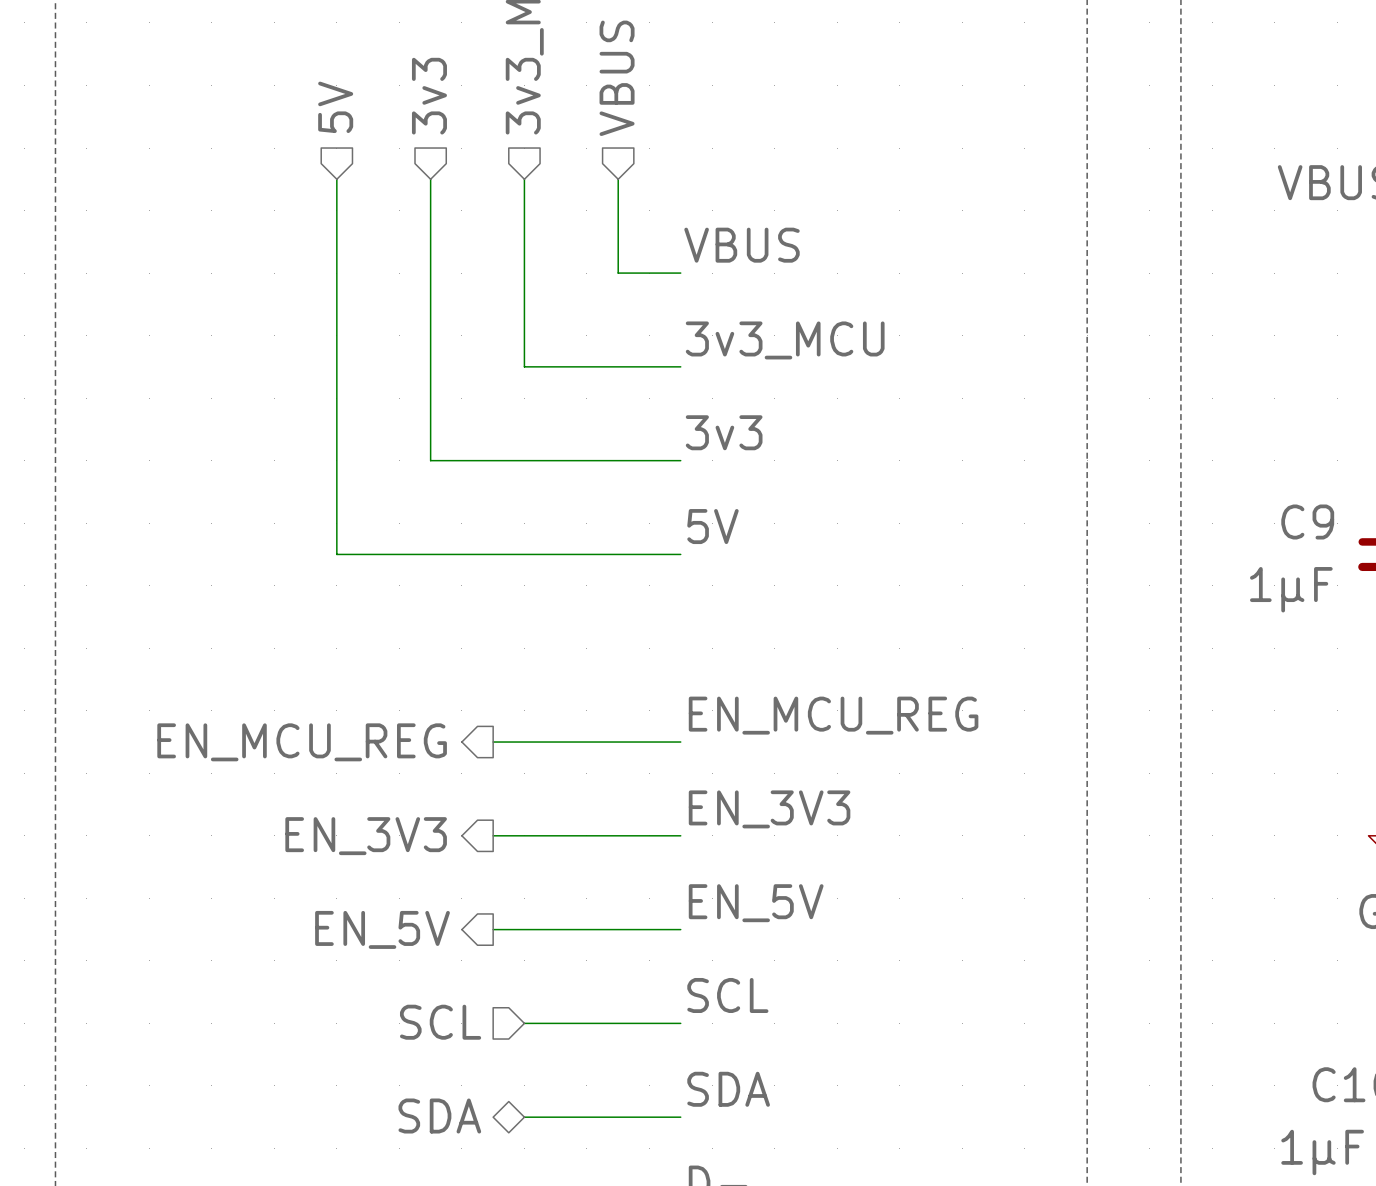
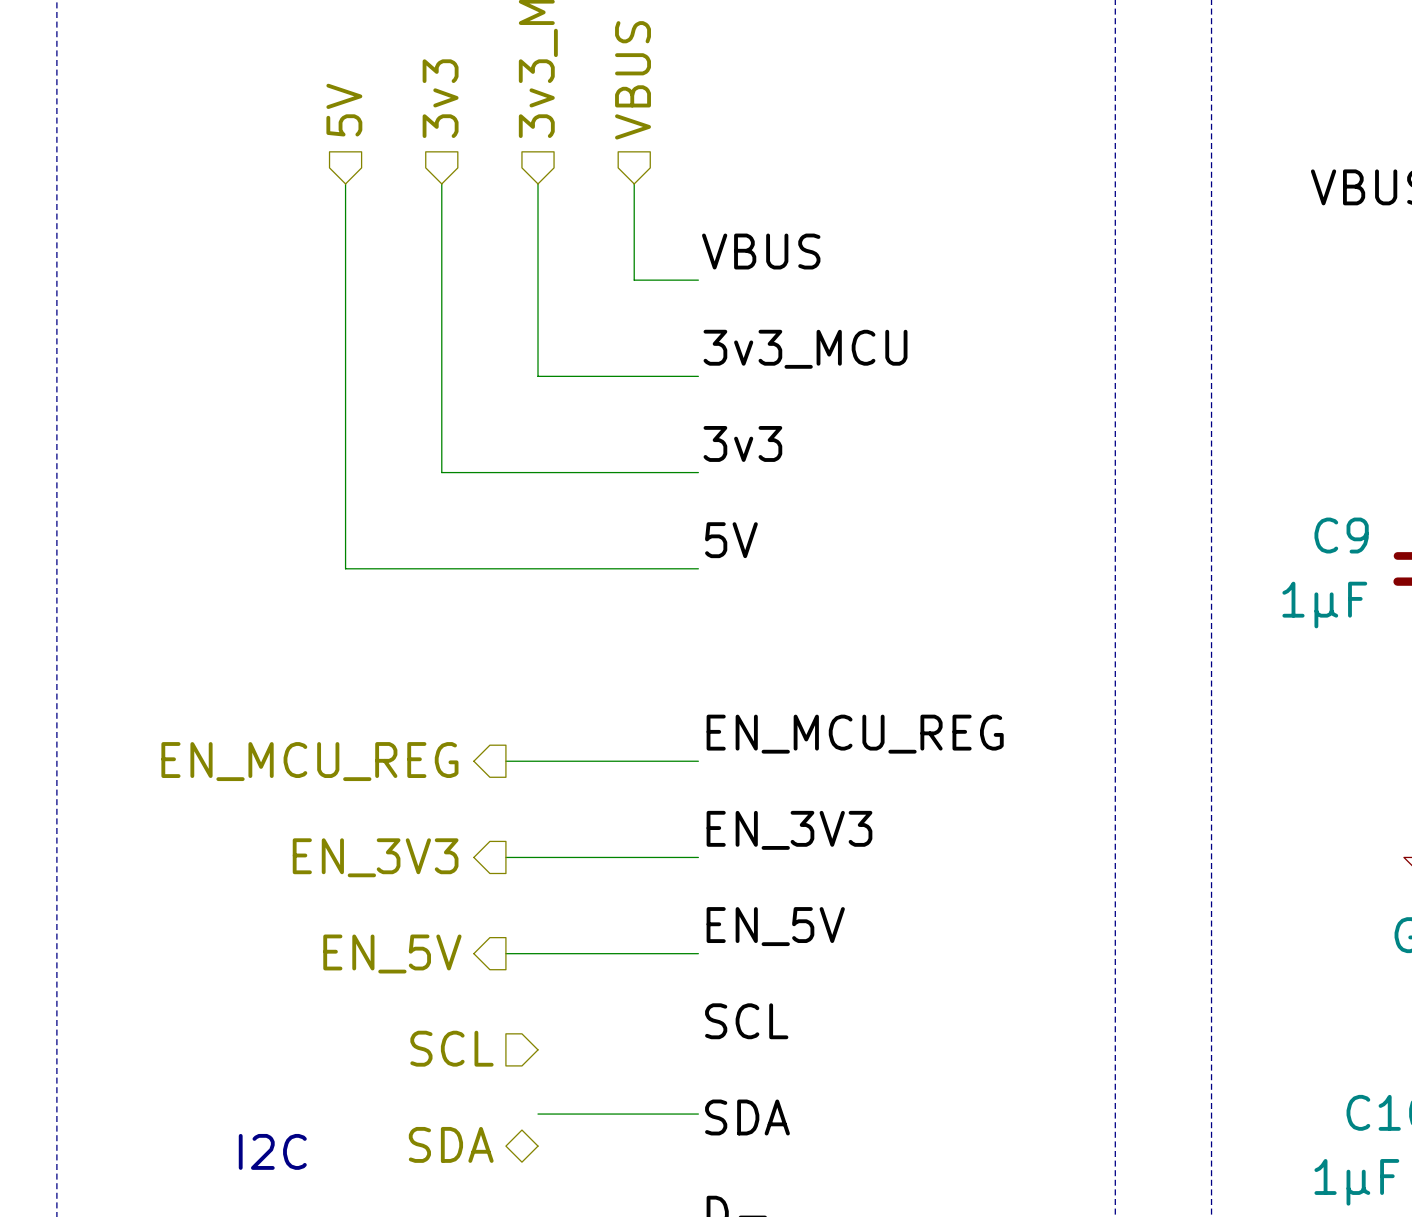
wire: (524, 1023) (680, 1023) -> none
wire: (524, 1117) (680, 1117) -> (538, 1114) (698, 1114)
text: none -> I2C (272, 1151)

